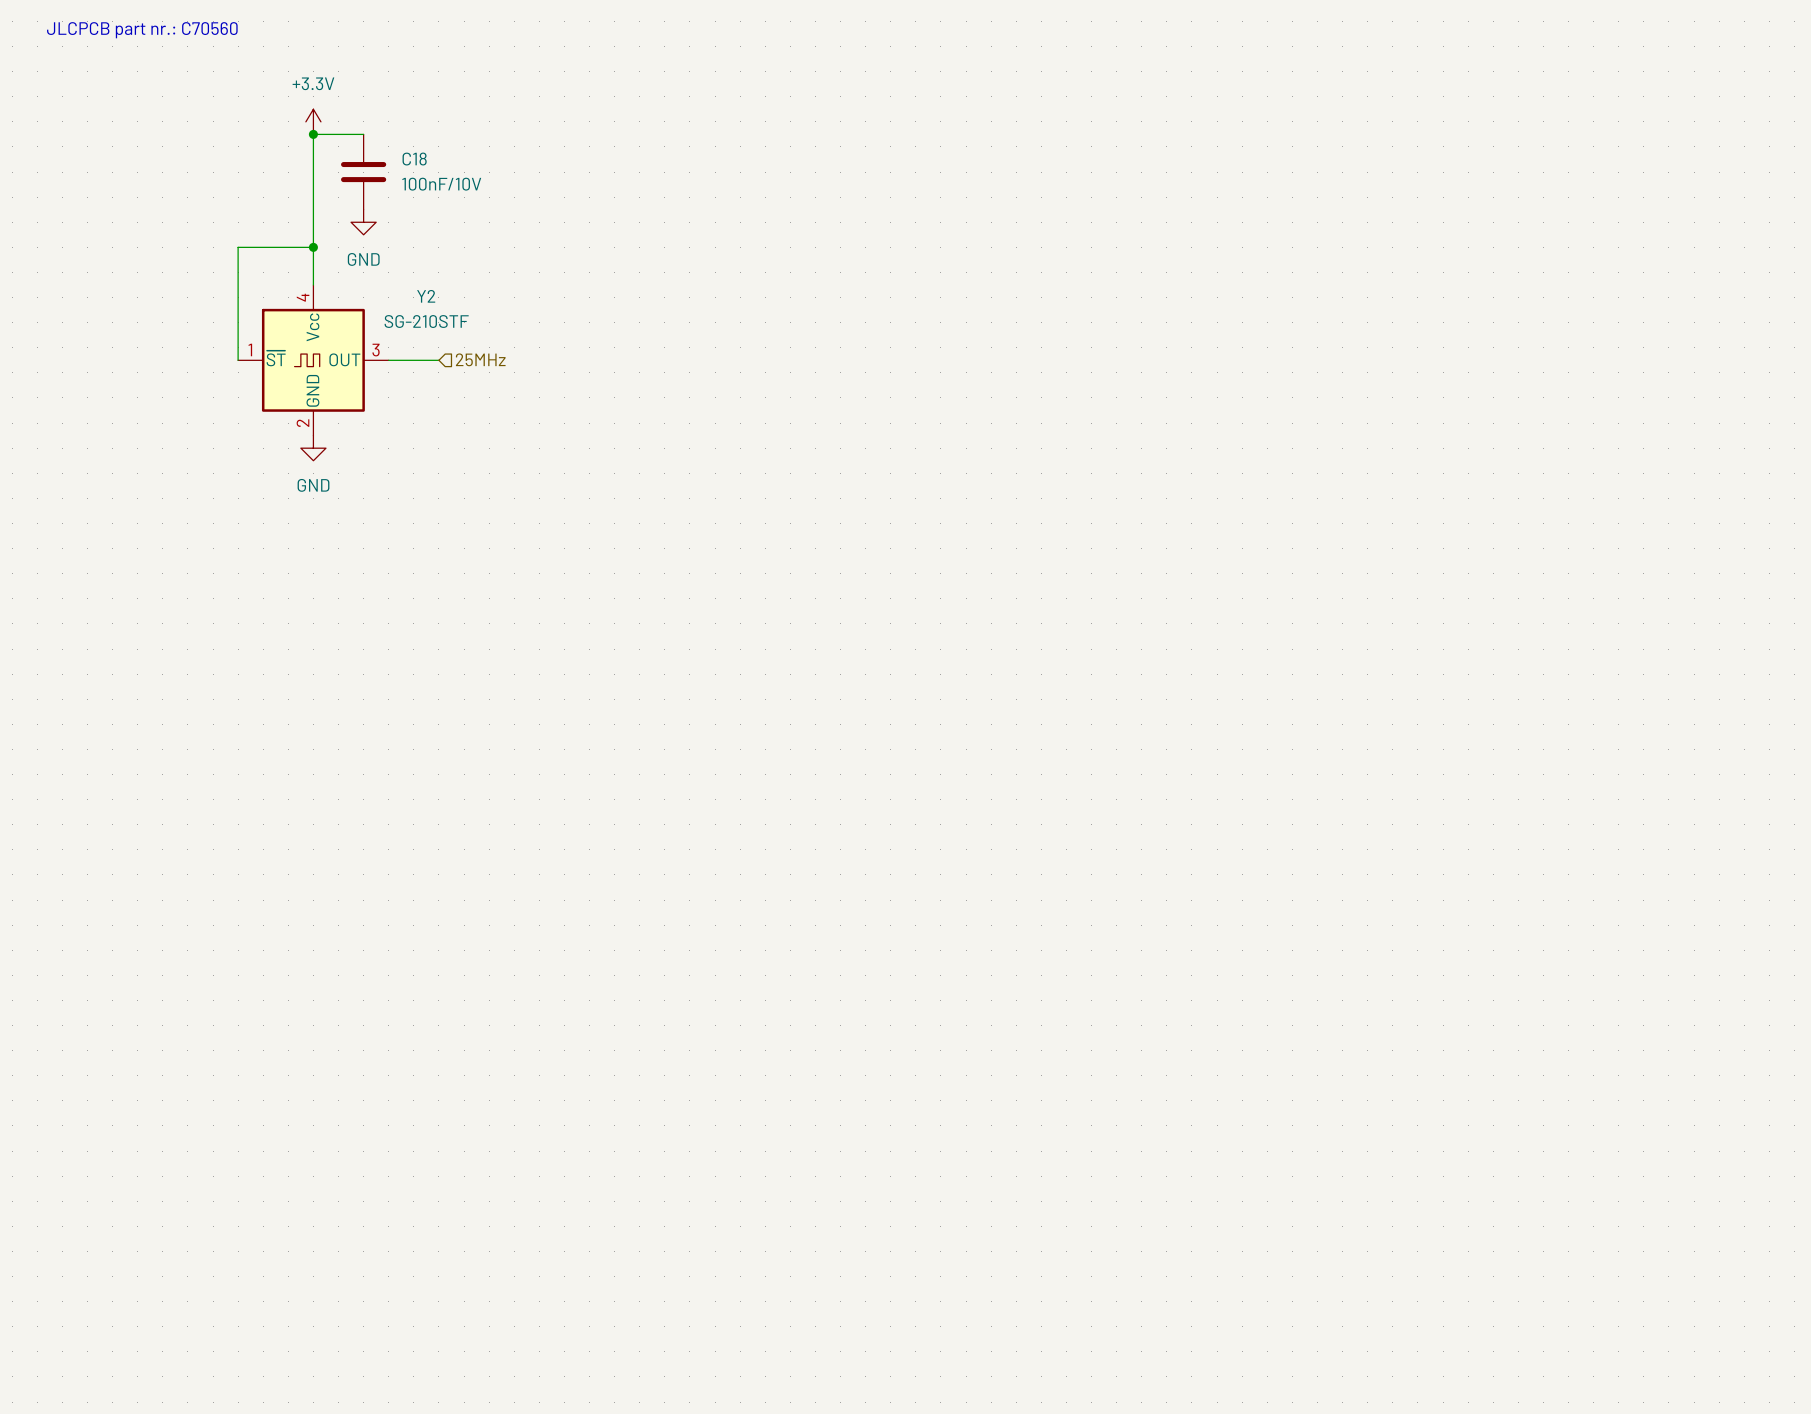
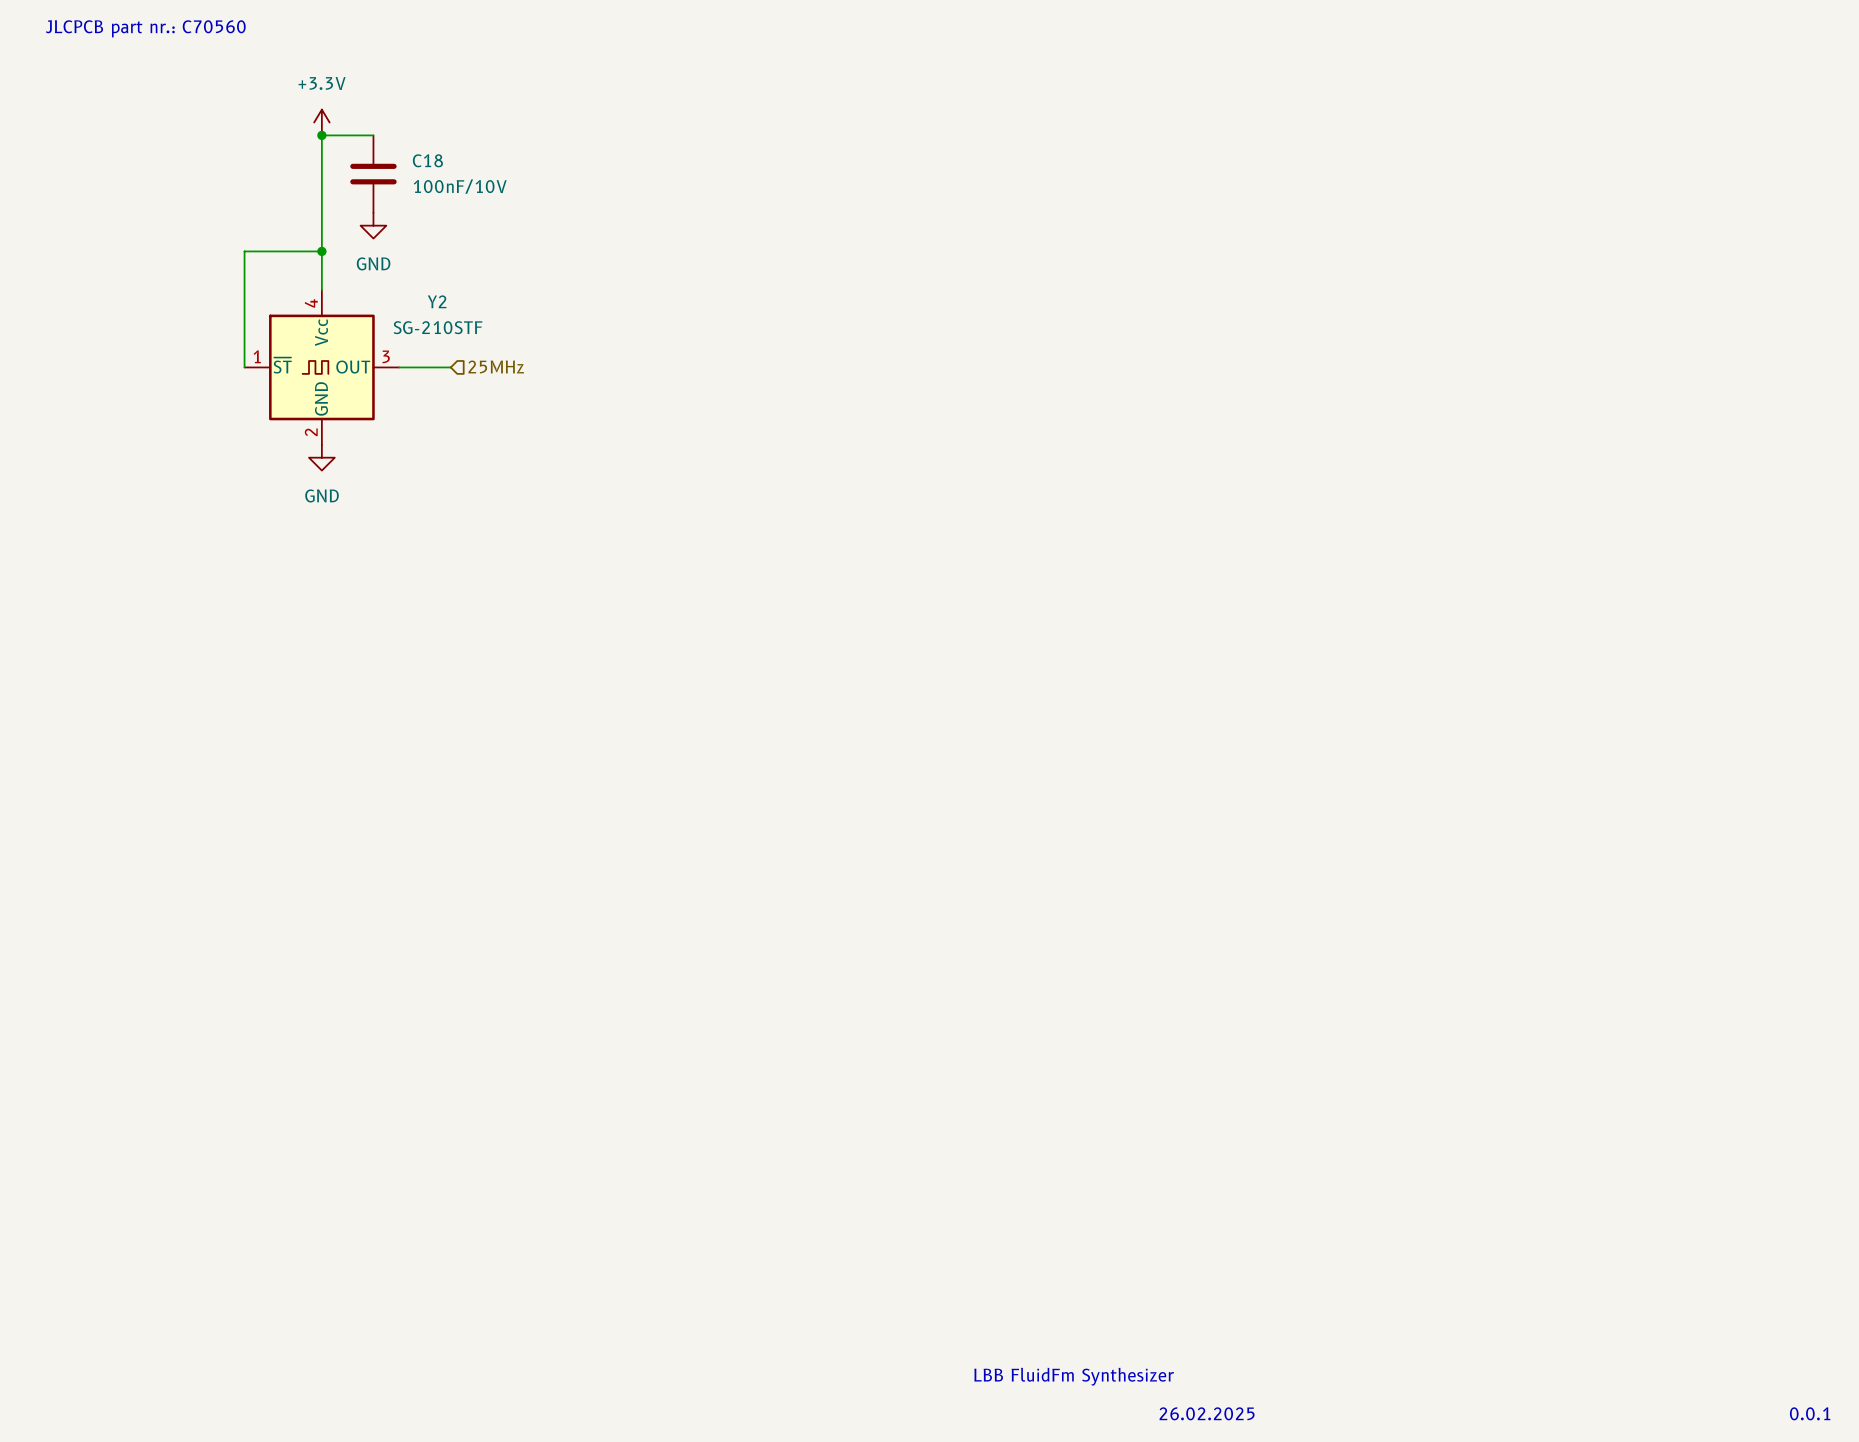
text: none -> LBB FluidFm Synthesizer (1074, 1376)
text: none -> 26.02.2025 (1207, 1413)
text: none -> 0.0.1 (1810, 1413)

